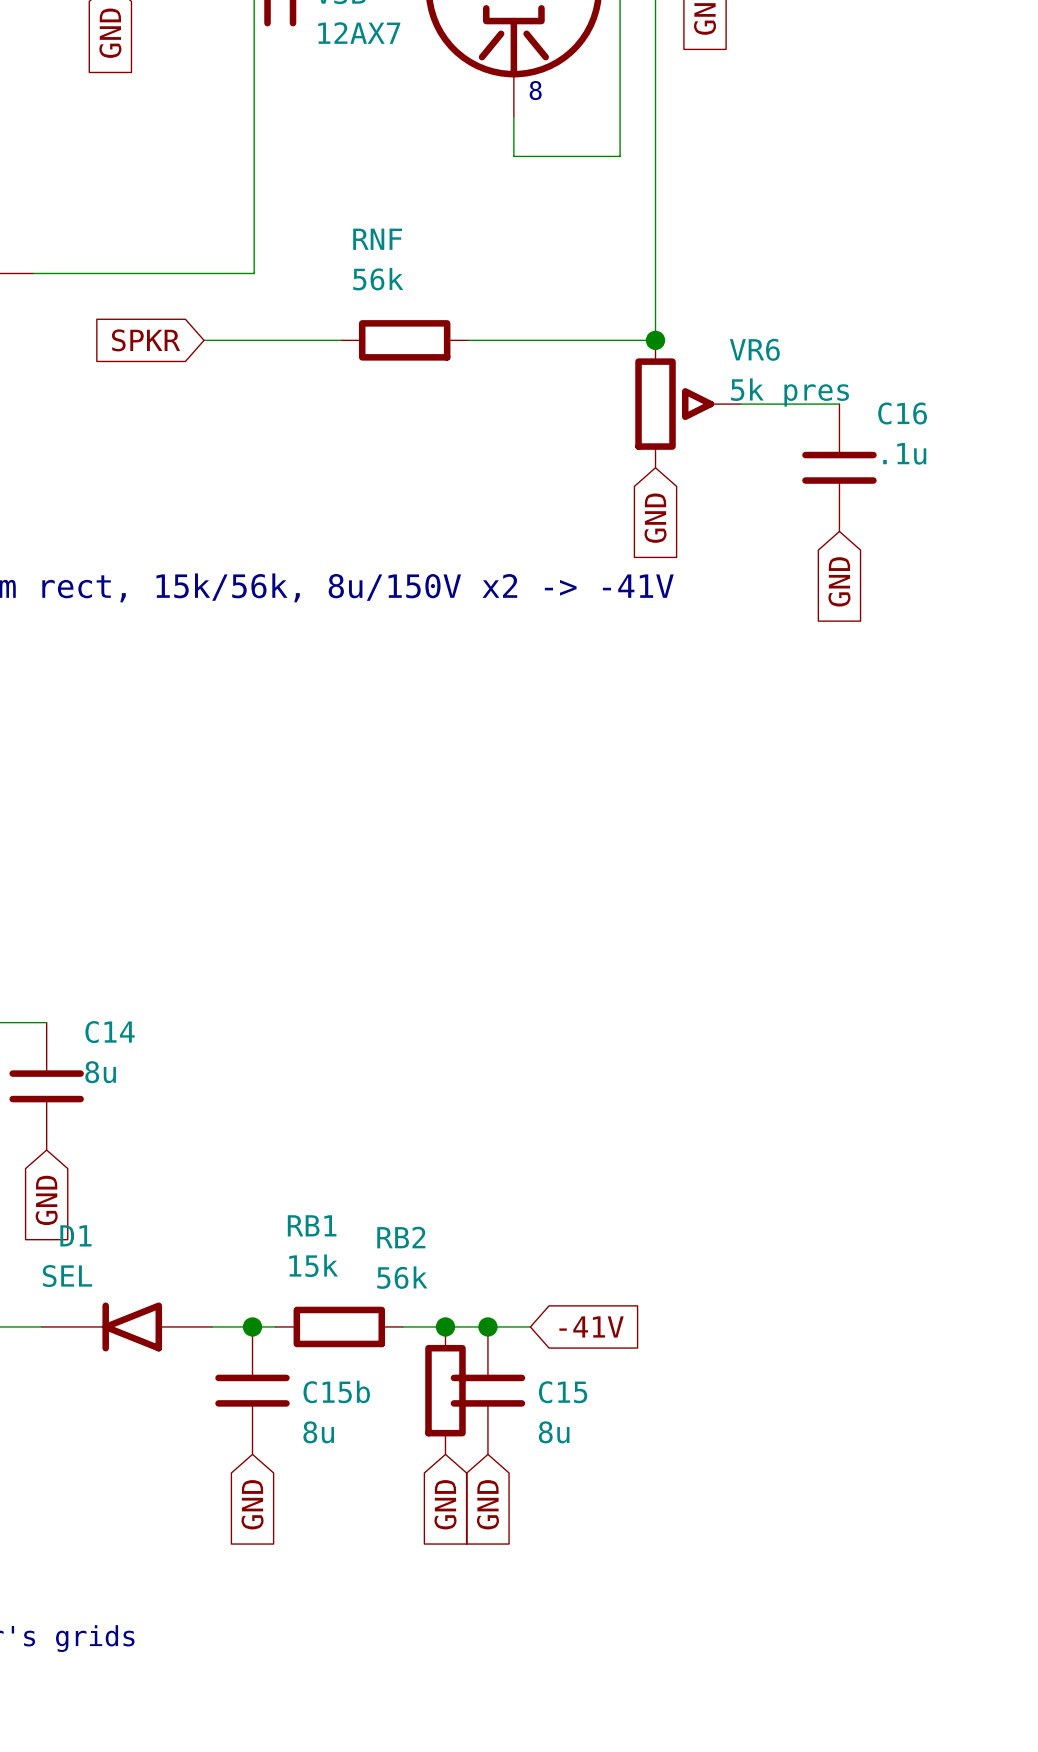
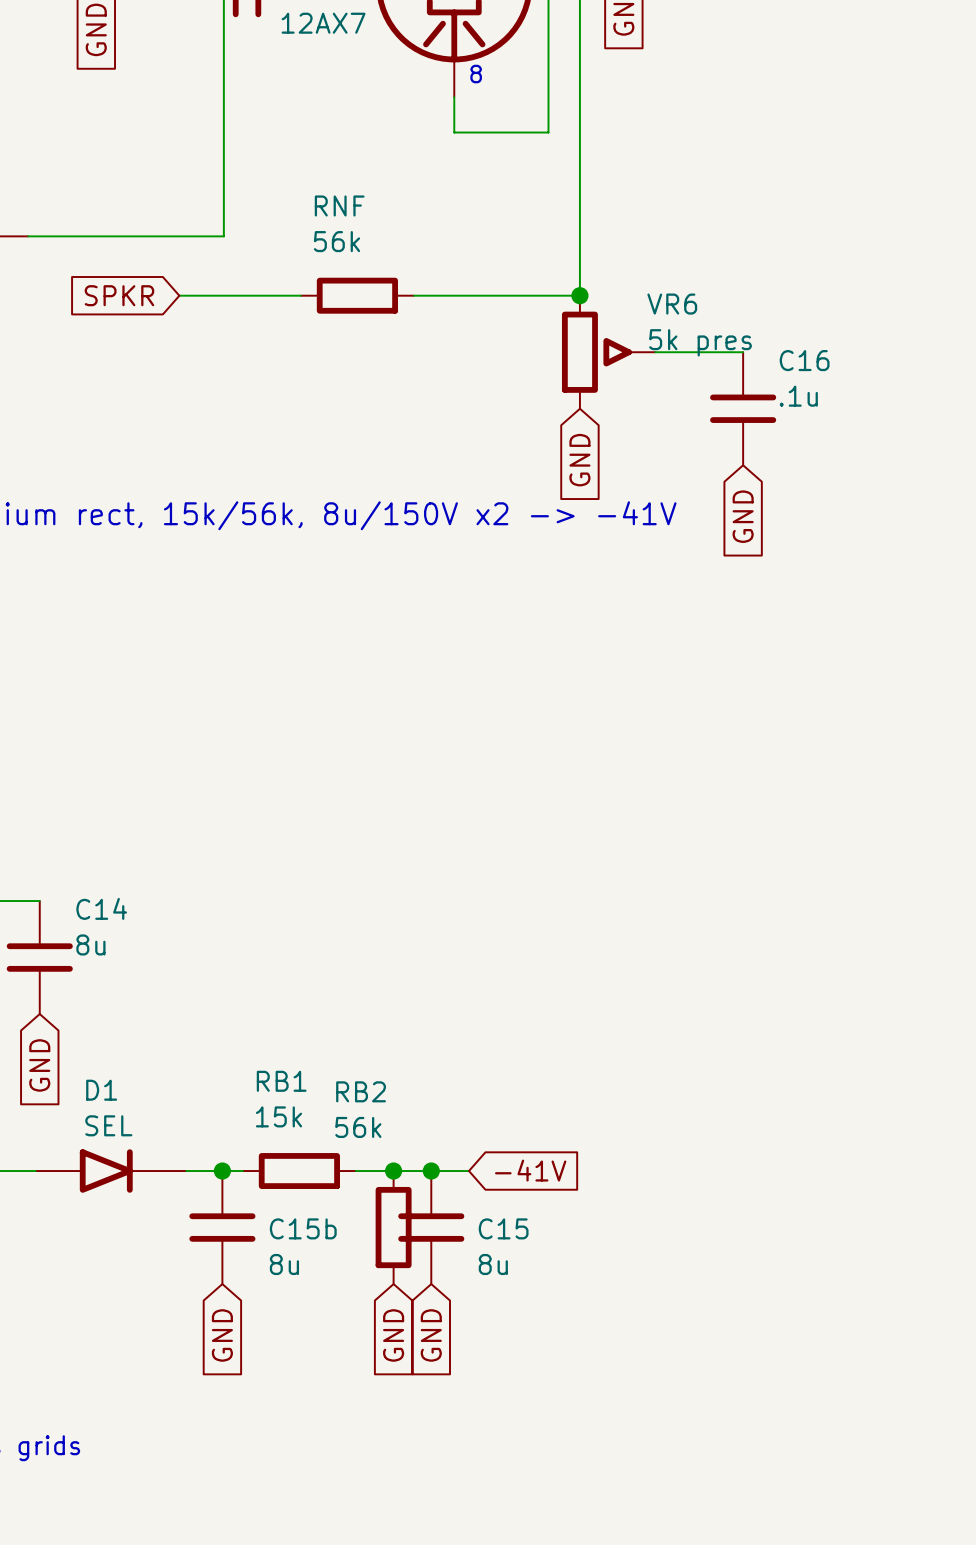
D1 name position: D1 (75, 1235) -> D1 (101, 1090)
D1 value position: SEL (67, 1276) -> SEL (108, 1125)
D1 rotation: 0° (132, 1326) -> 180° (106, 1171)

